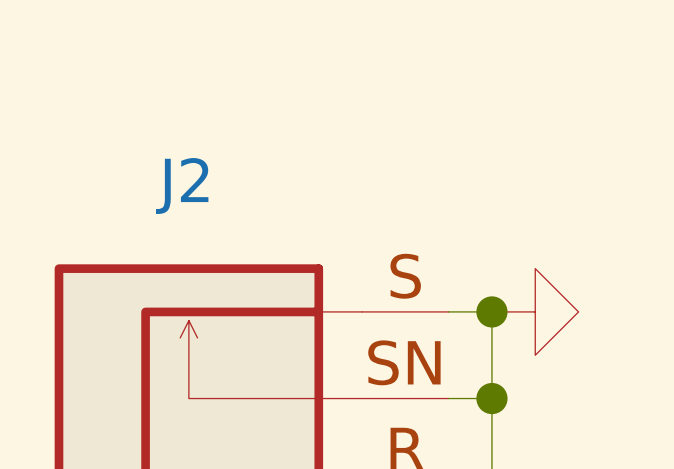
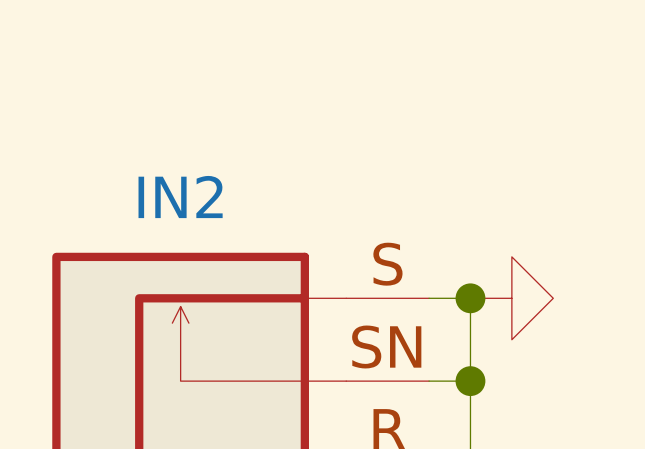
J2 name: J2 (182, 185) -> IN2 (180, 197)

